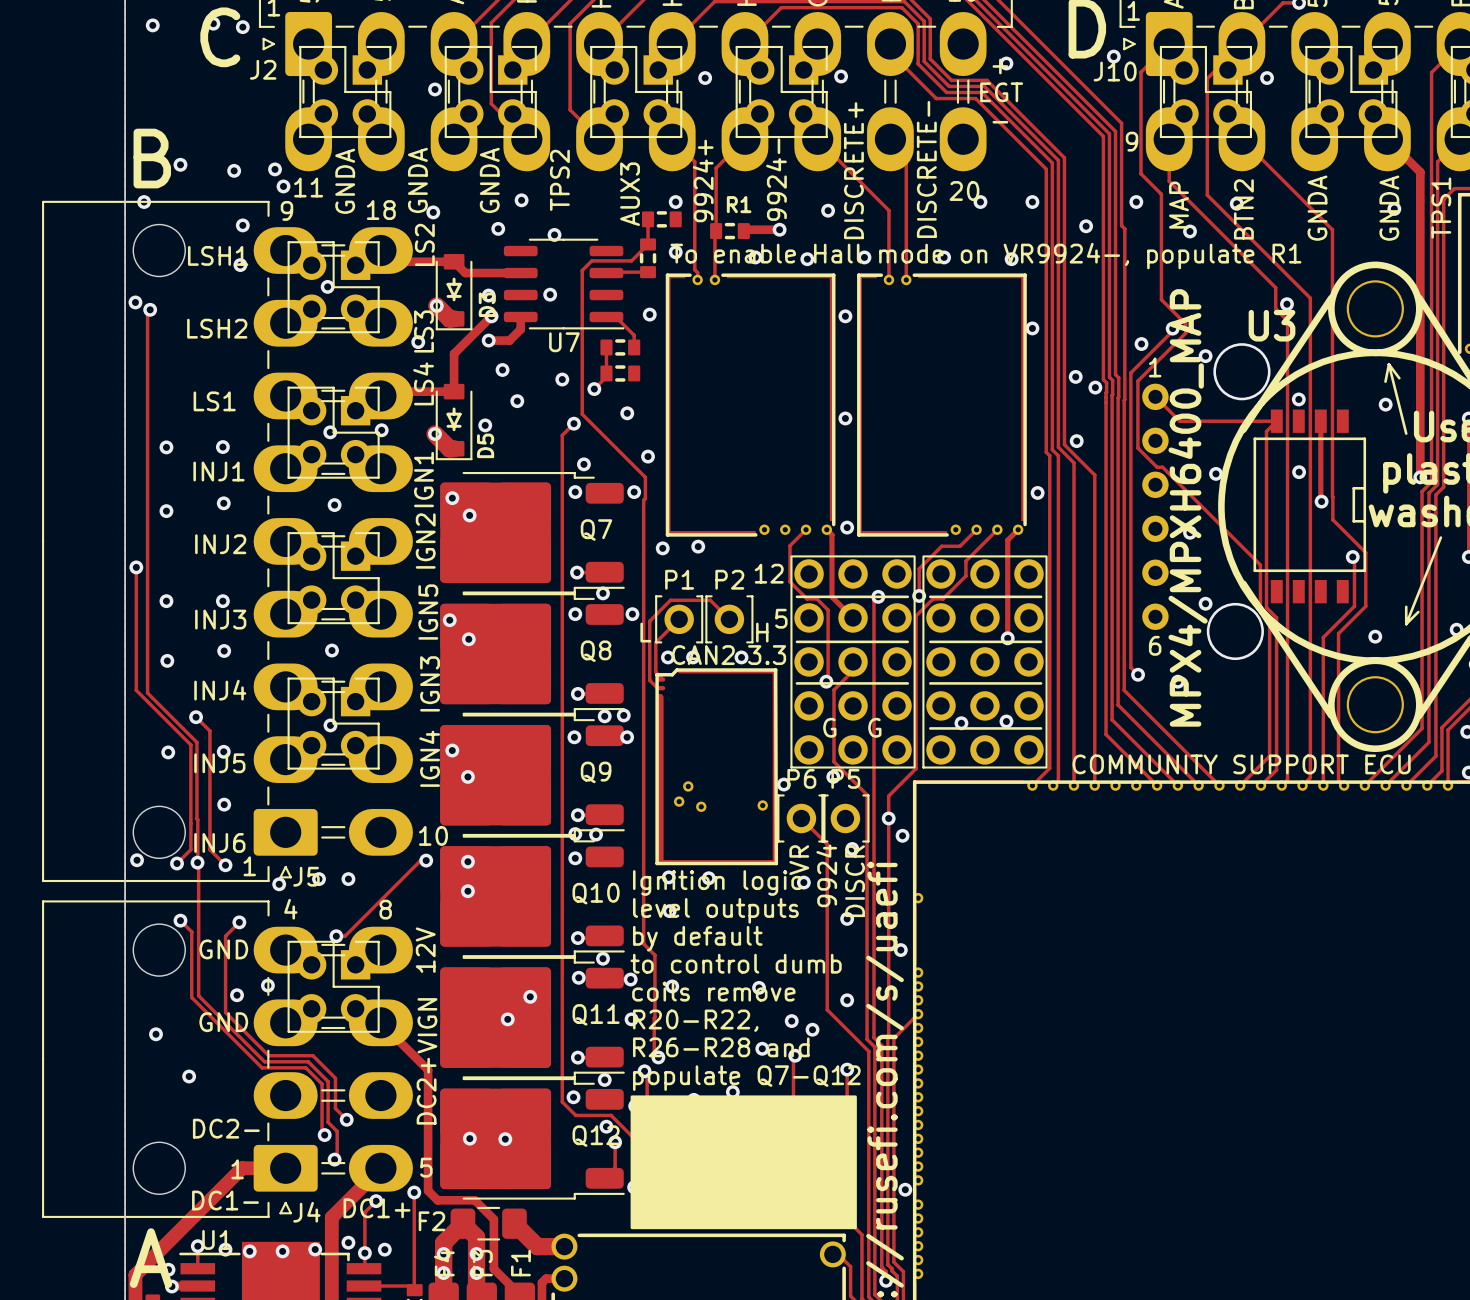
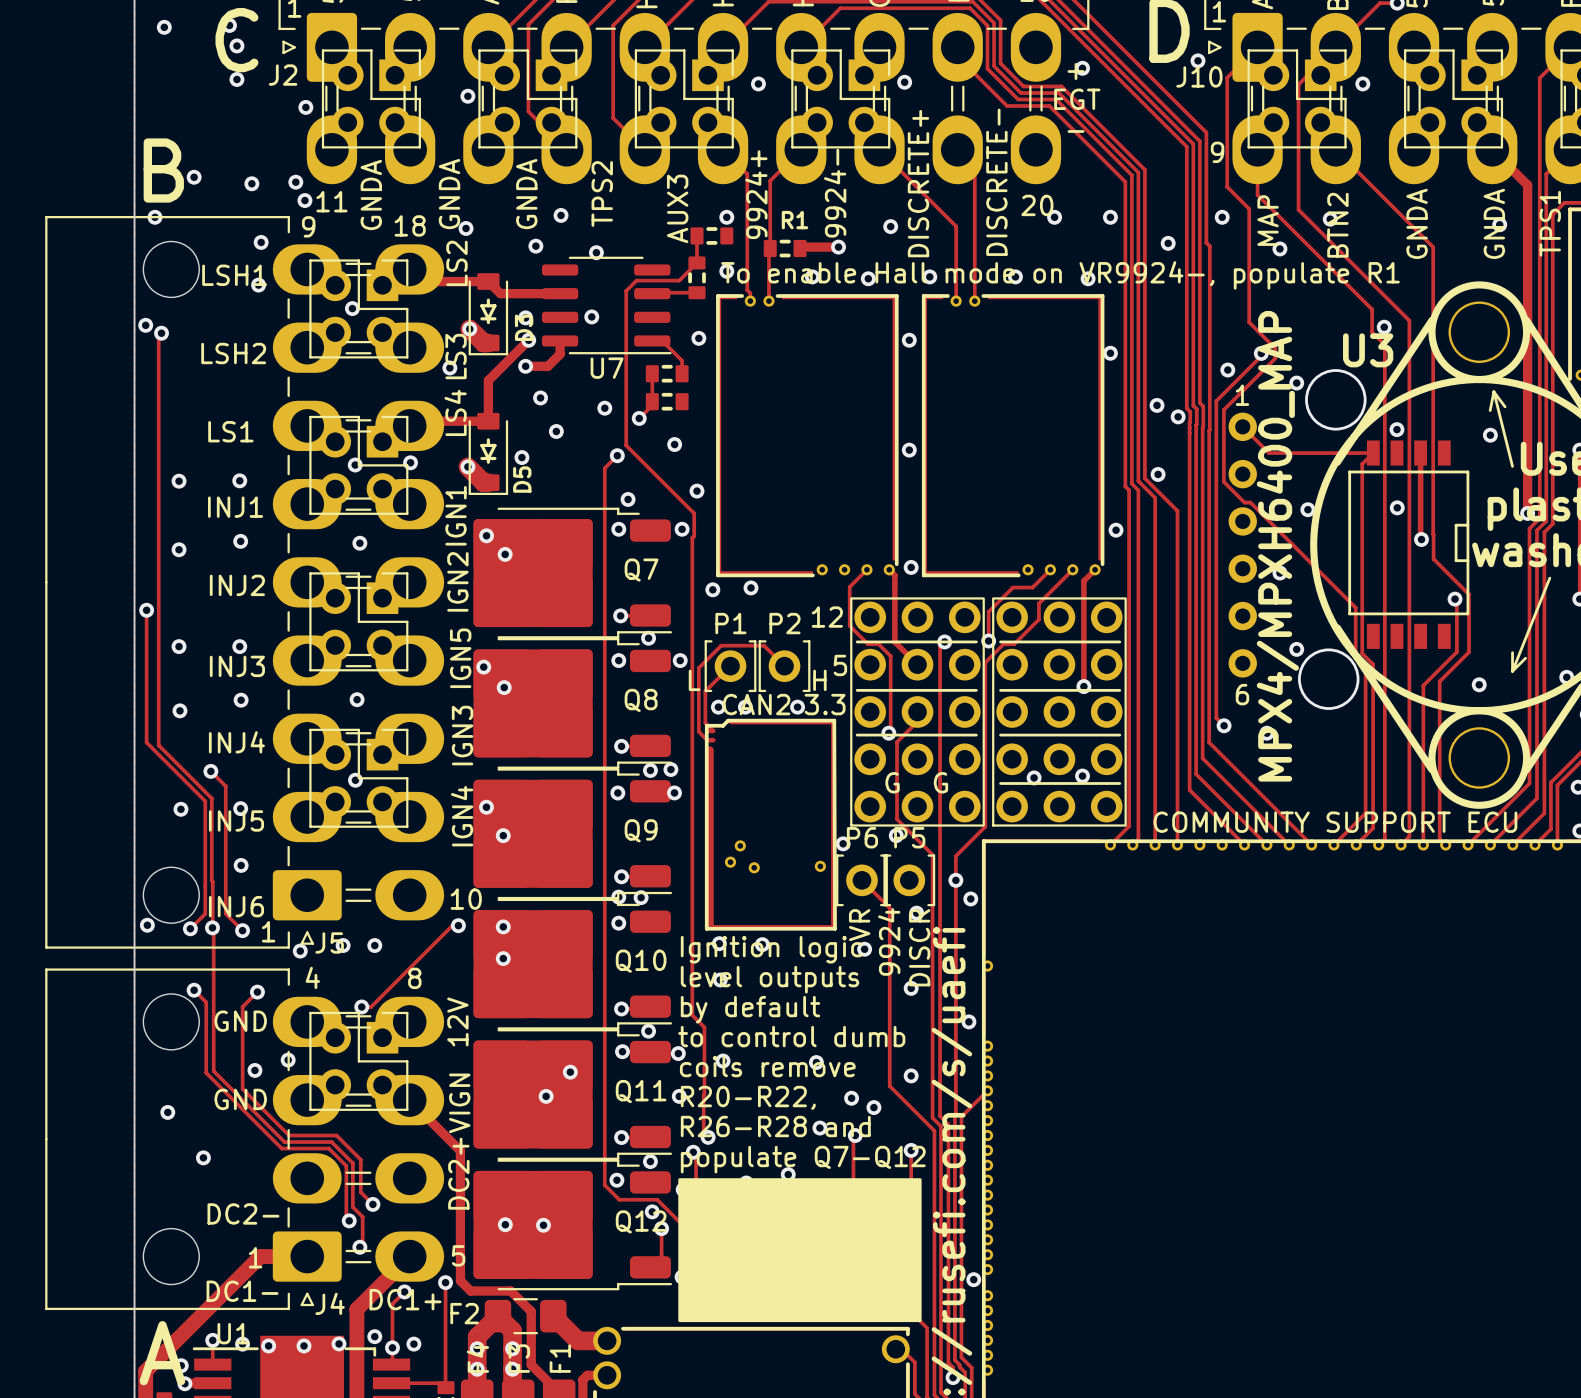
via: (242, 27) -> none
via: none -> (236, 45)
via: none -> (236, 79)
via: none -> (305, 107)

